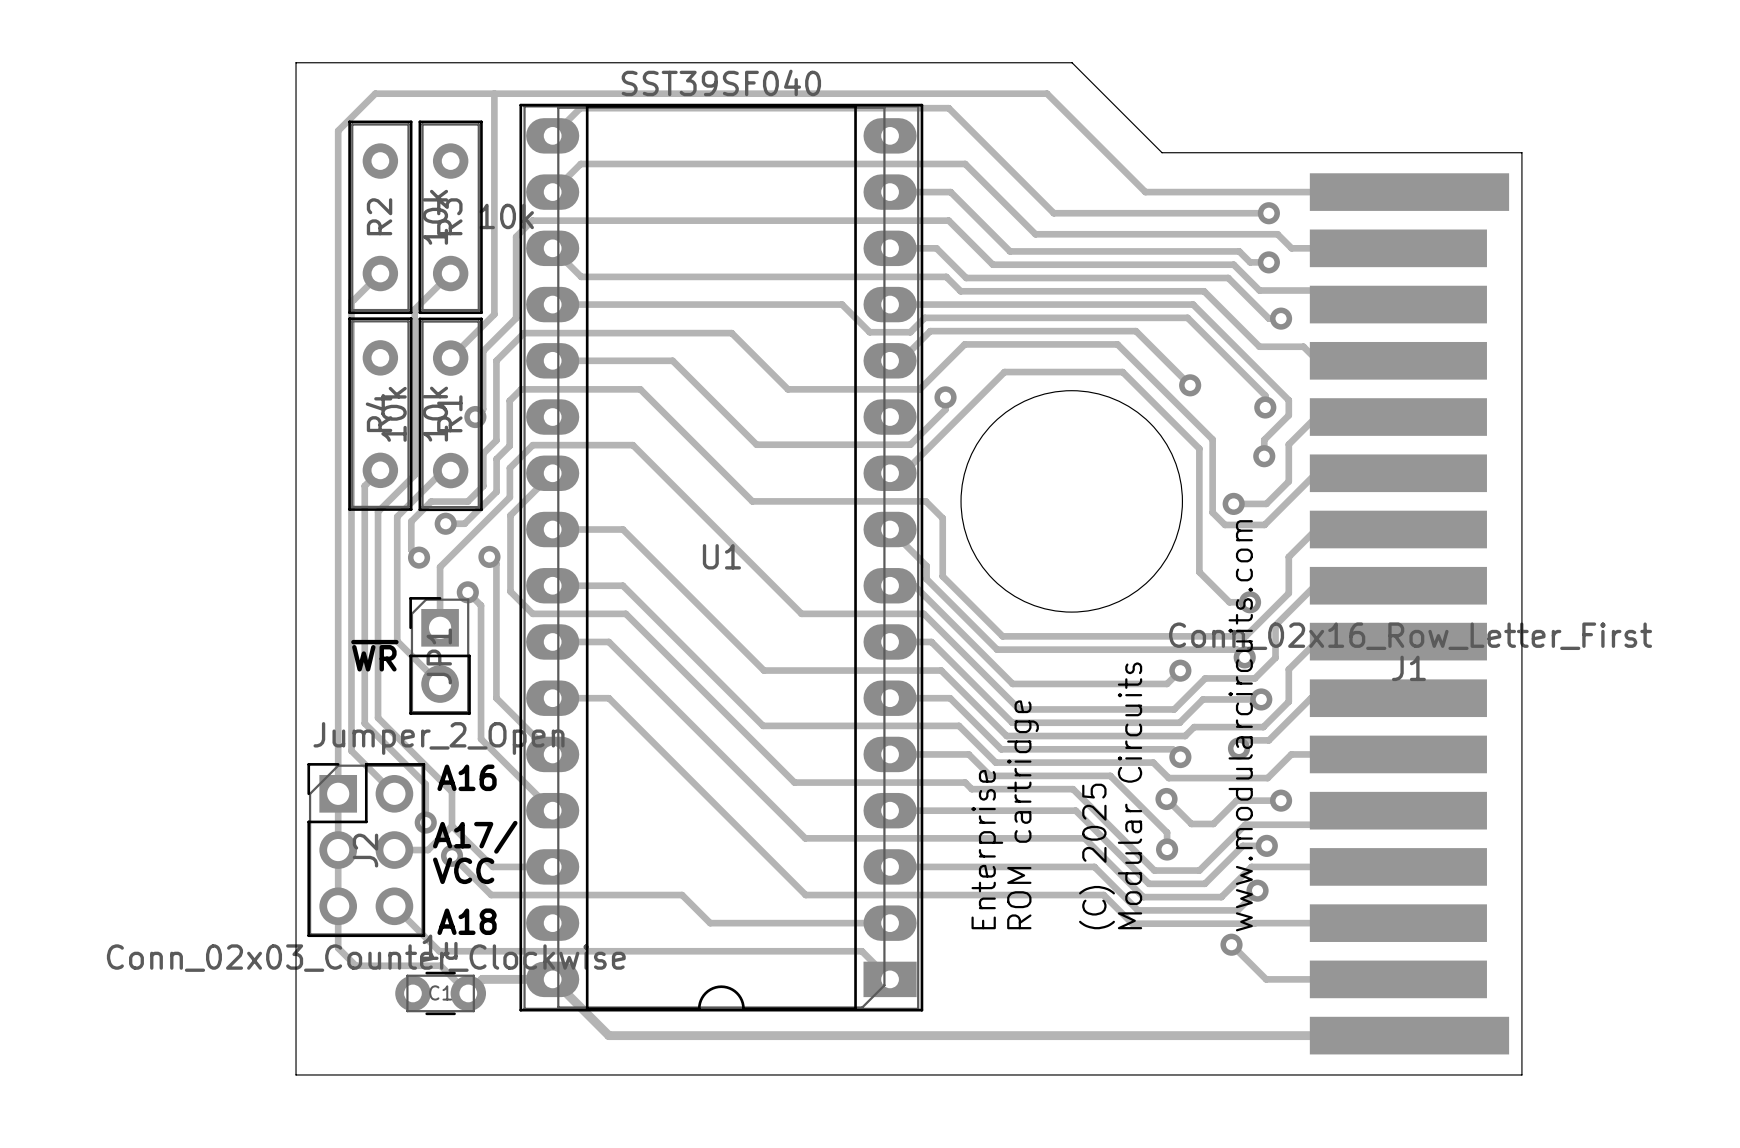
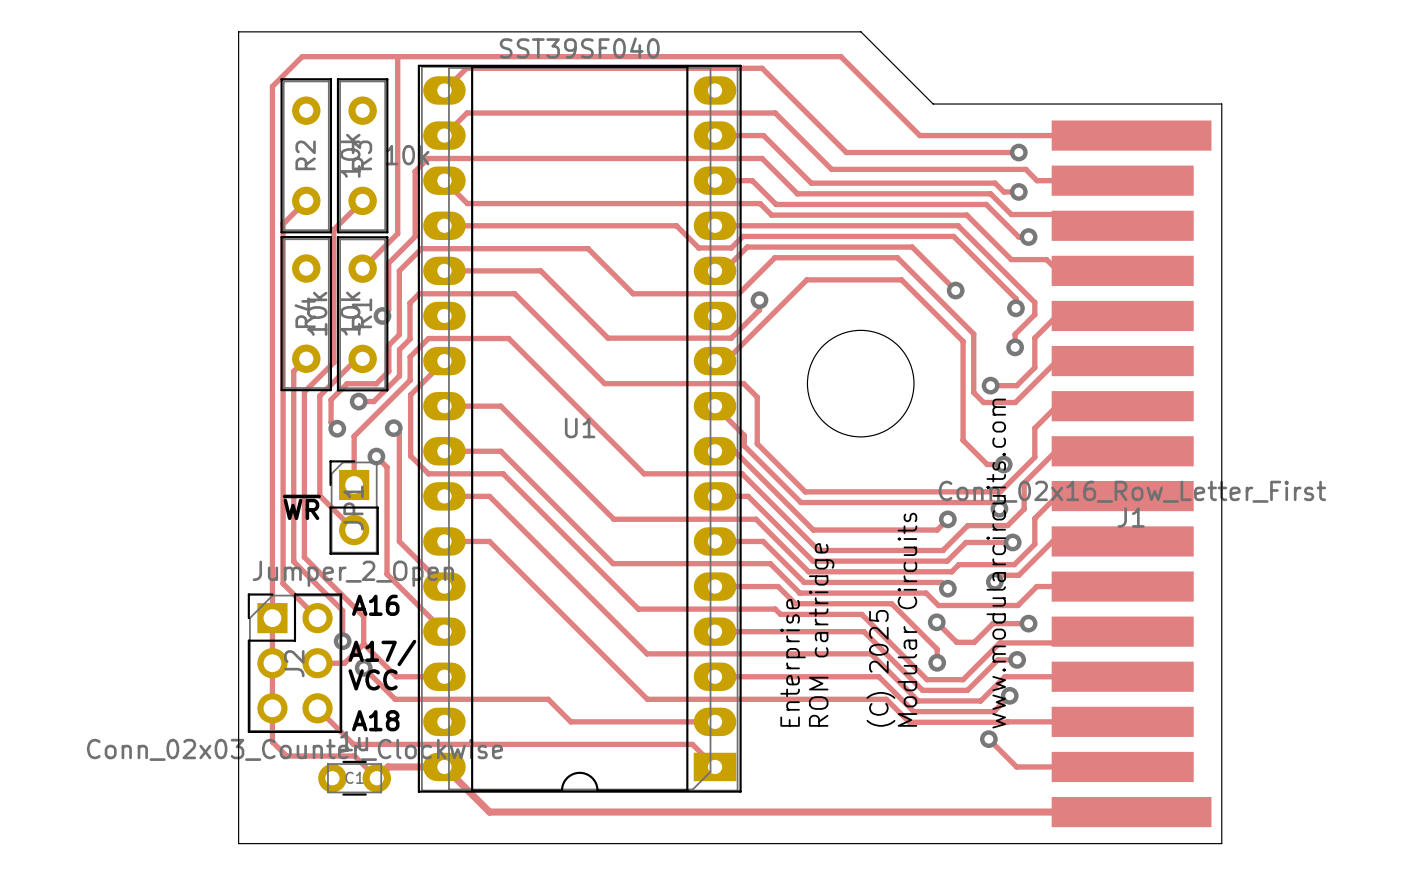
round board edge size: [960, 390, 1183, 613] -> [807, 329, 915, 438]

